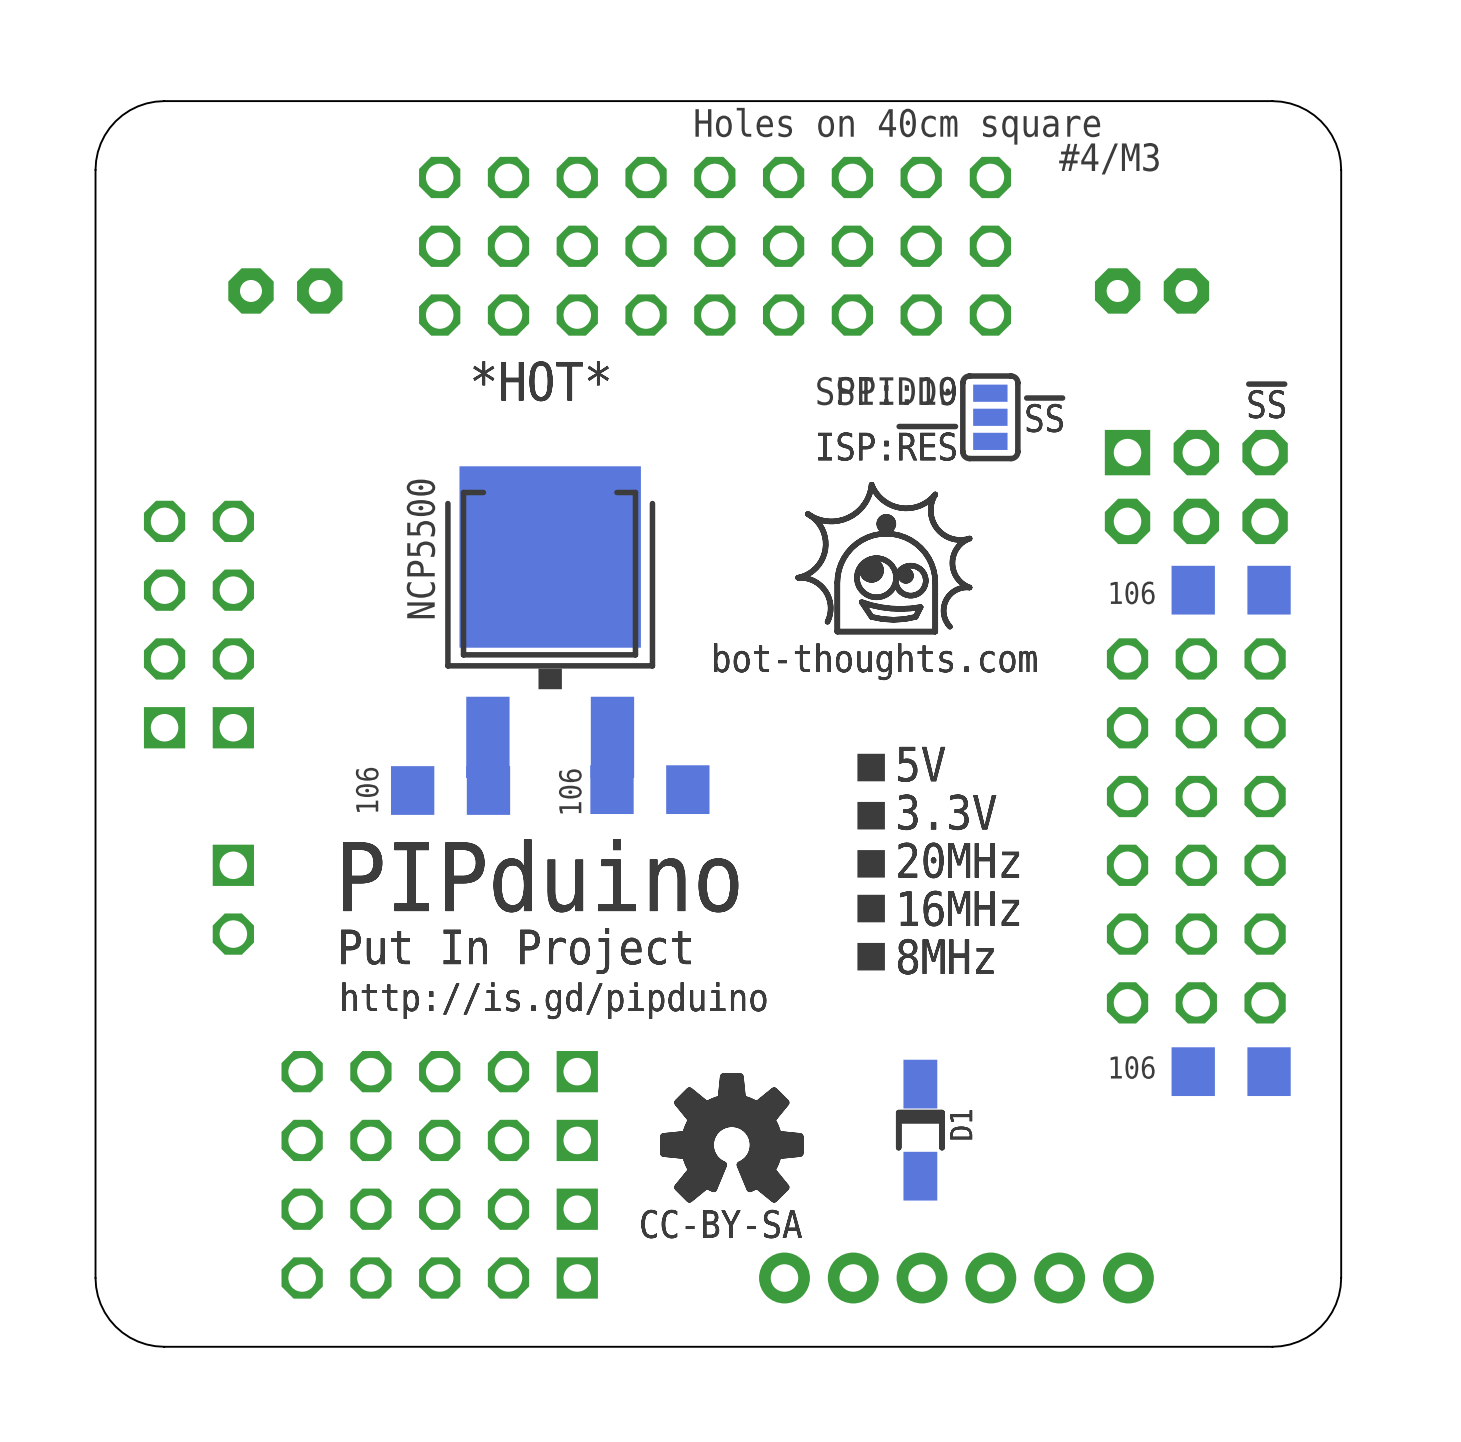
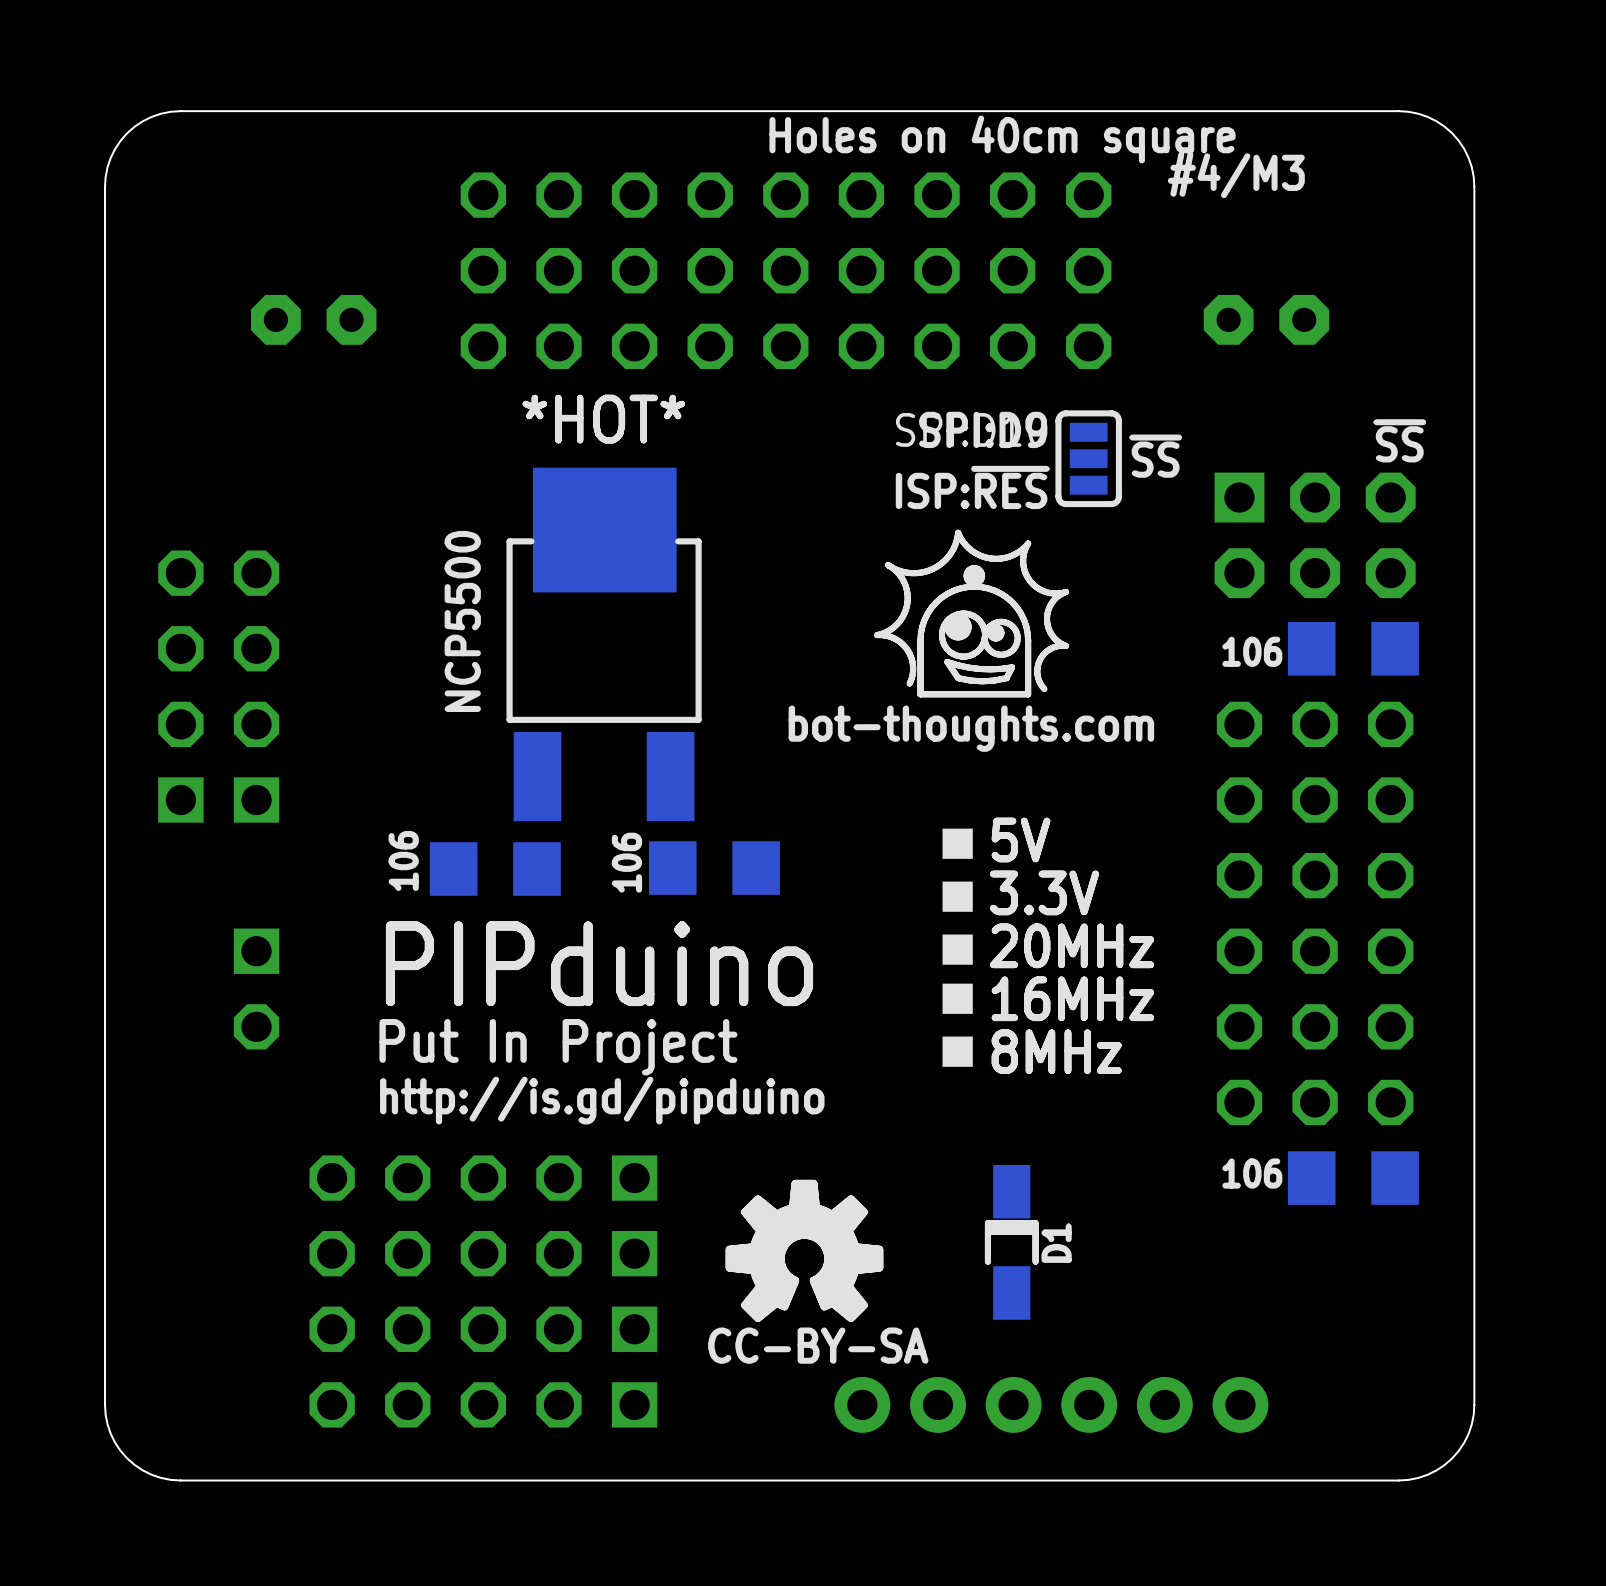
part: none -> (604, 644)
part: (550, 622) -> none

